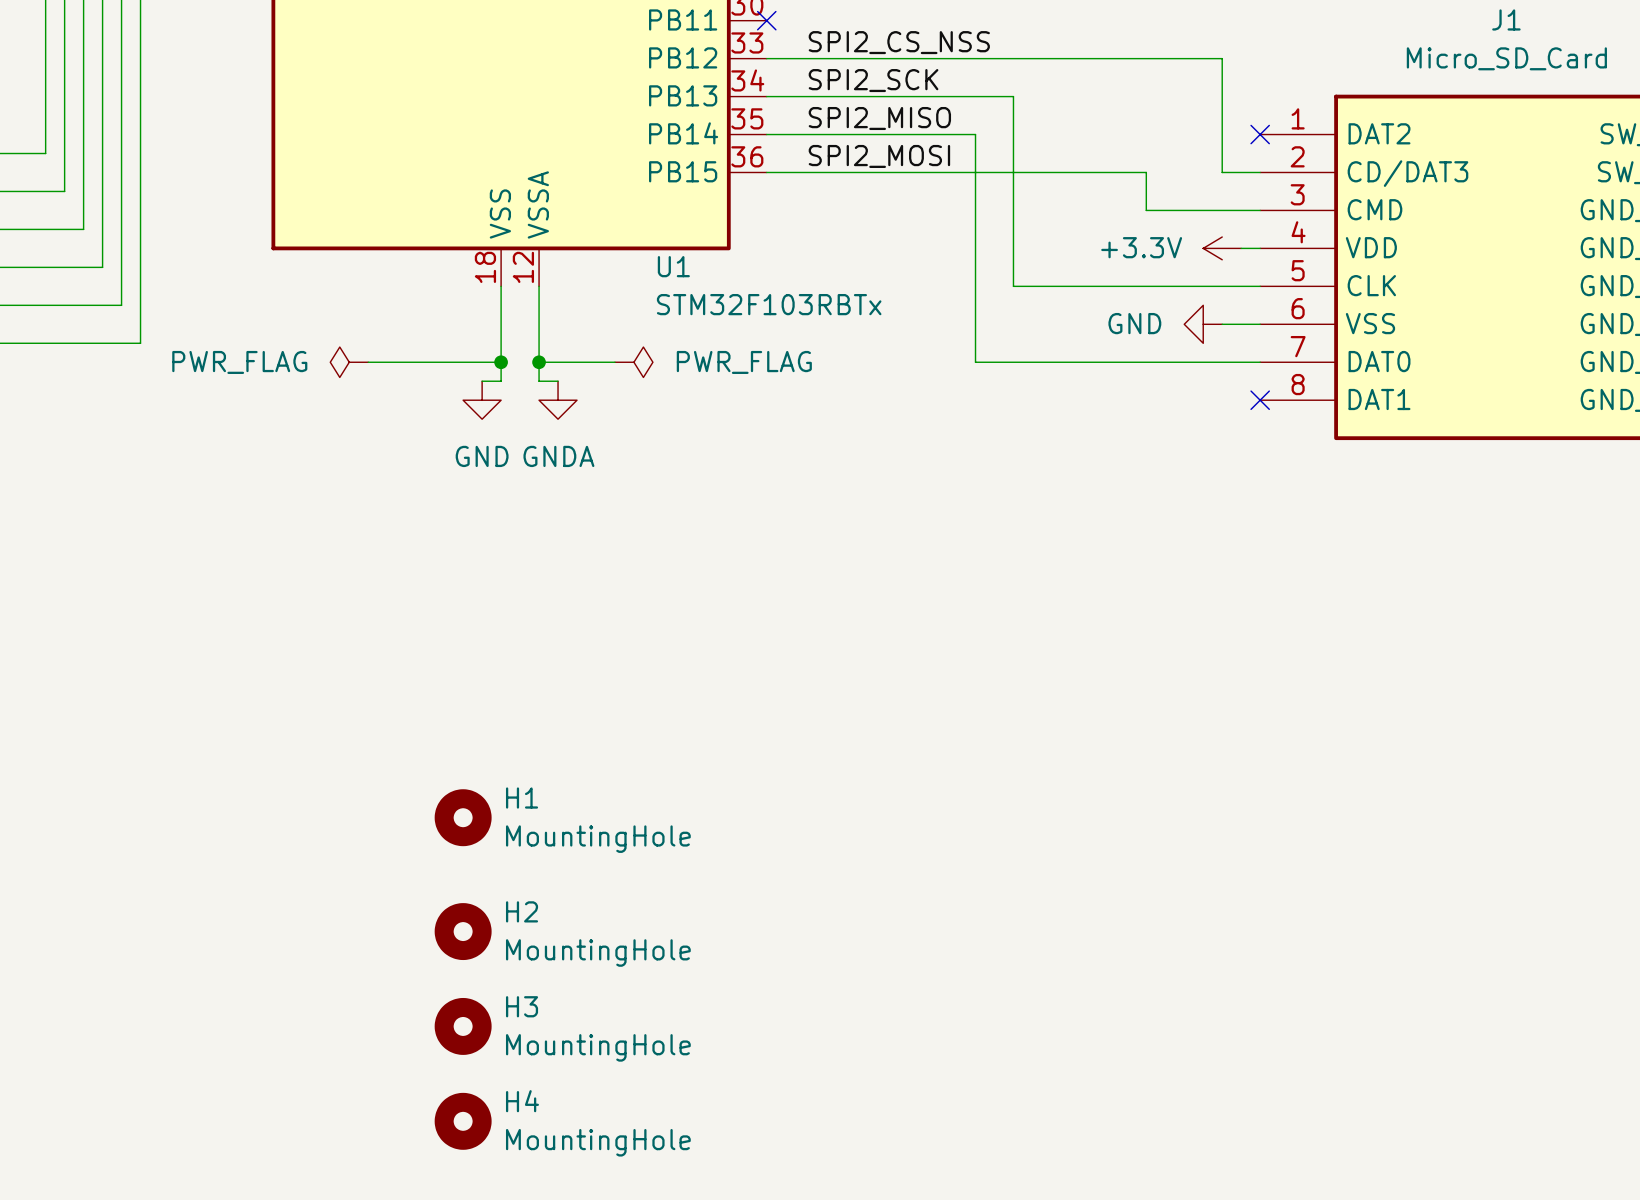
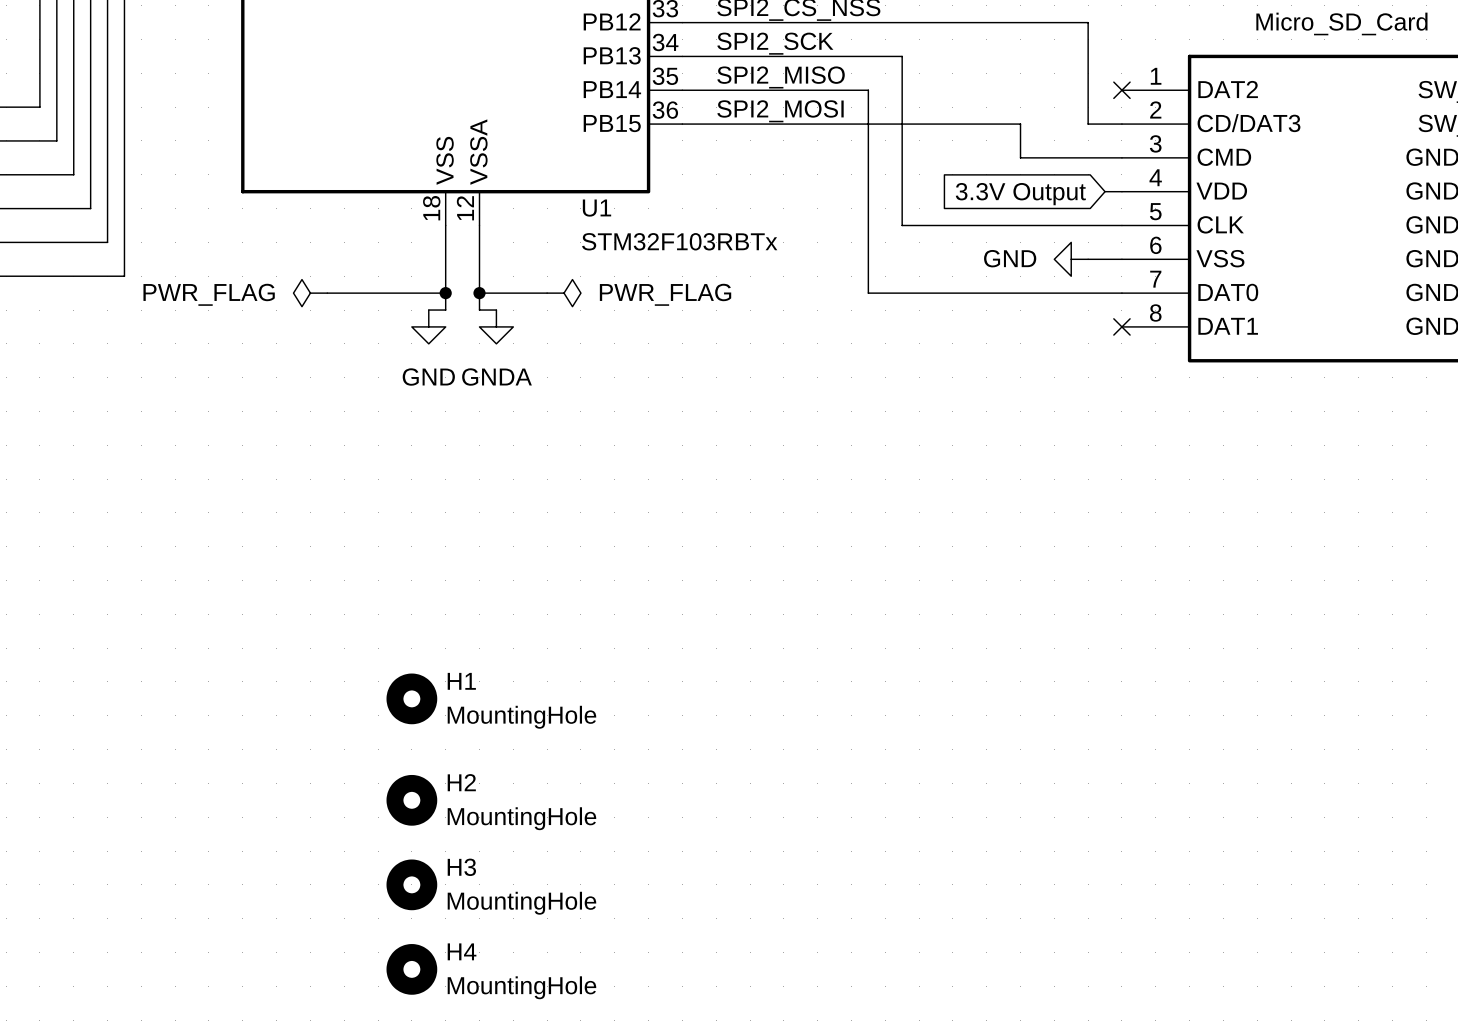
power symbol: +3.3V (1222, 248) -> none
global label: none -> 3.3V Output (1020, 194)

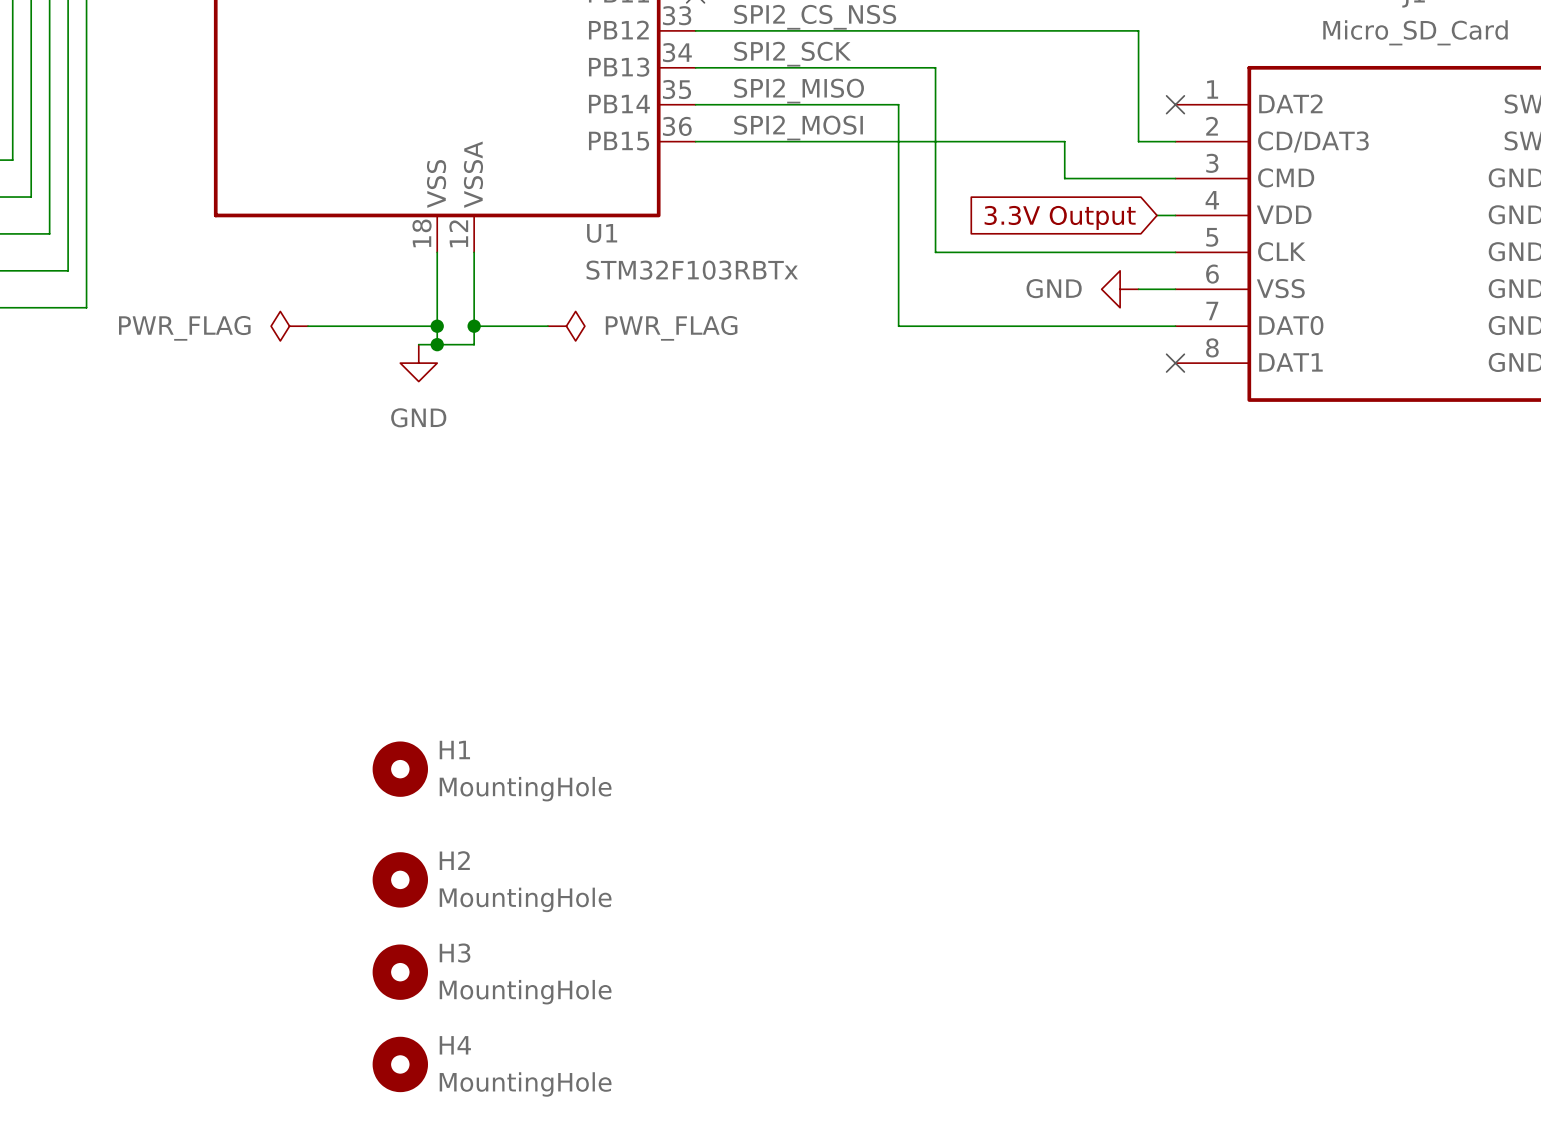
junction: none -> (437, 344)
wire: (479, 310) (496, 310) -> (474, 344) (437, 344)
power symbol: GNDA (496, 326) -> none

